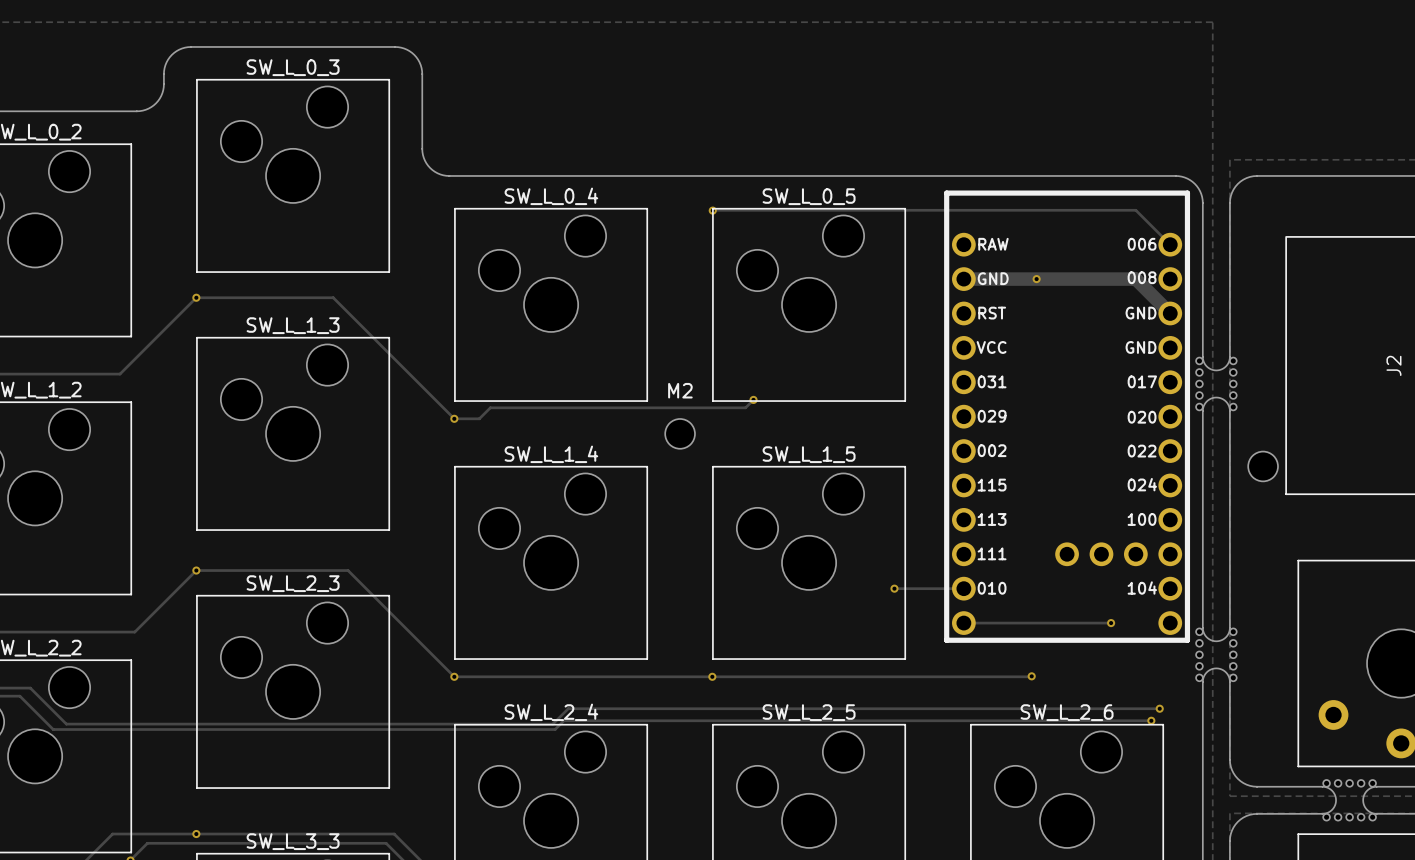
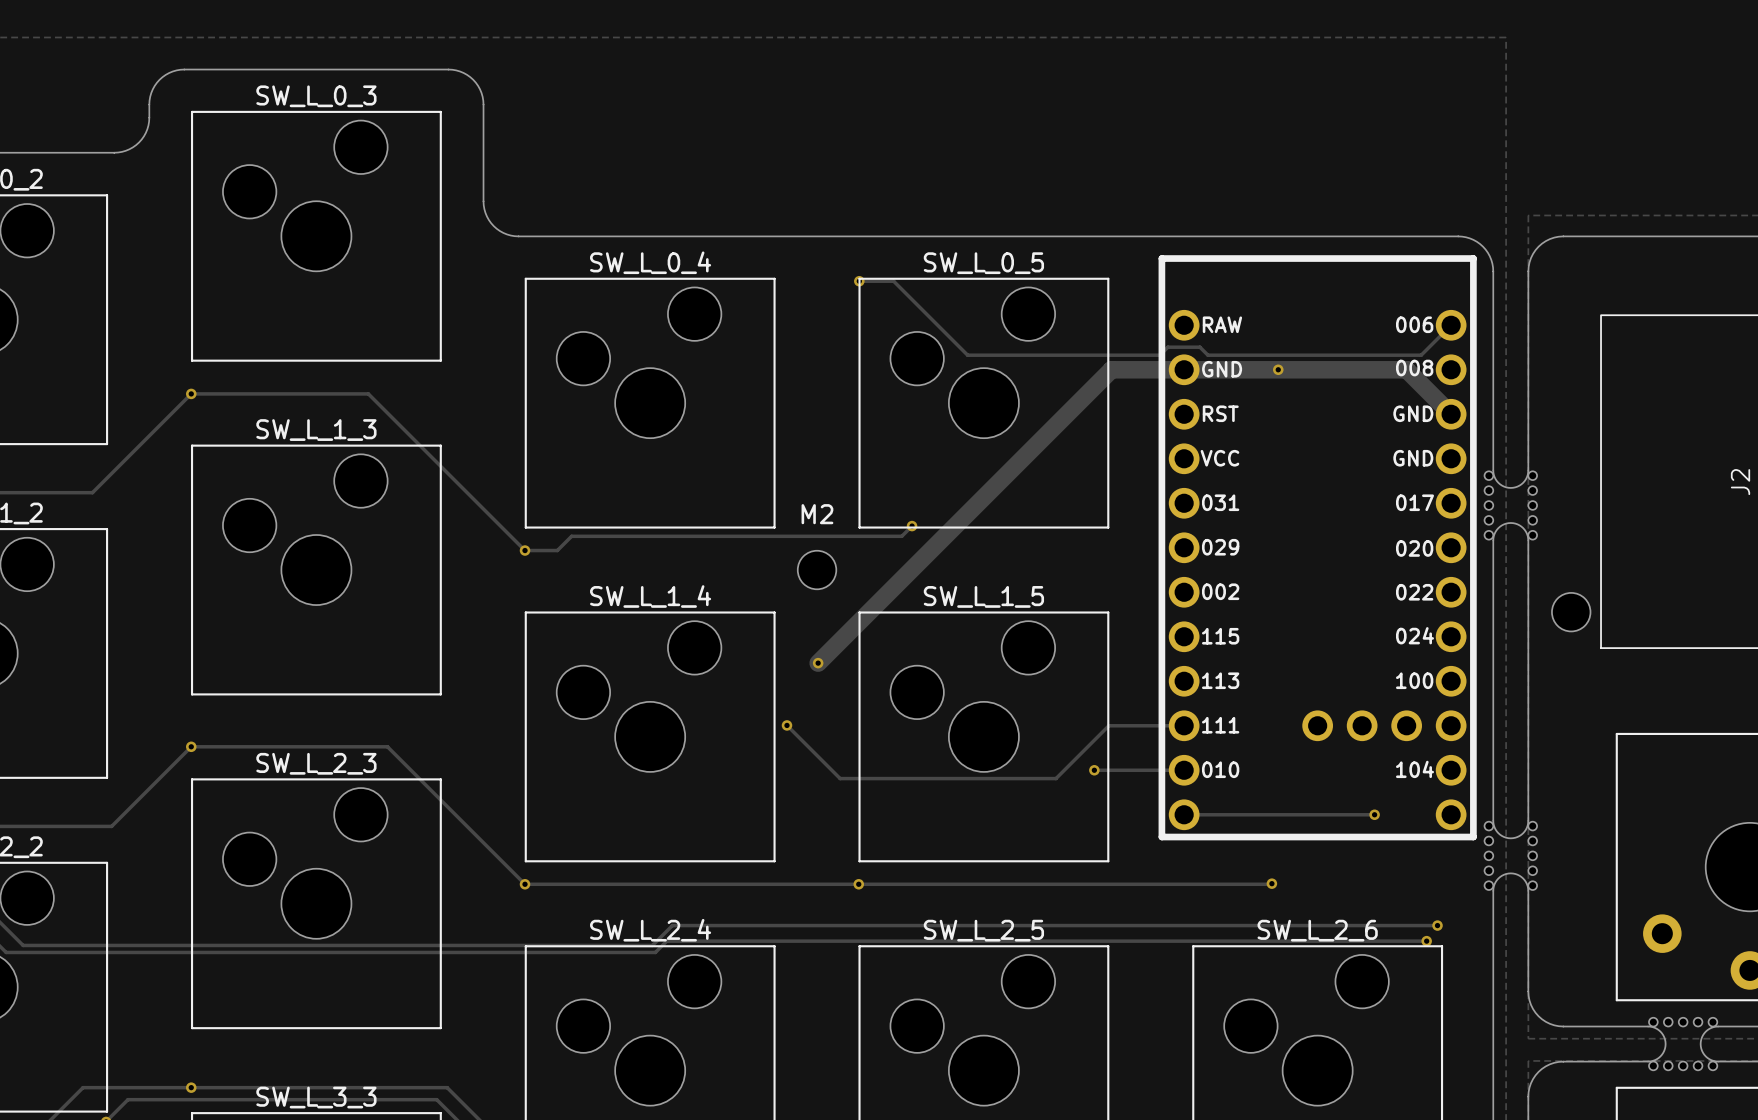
track: (713, 210) (1135, 210) (1170, 244) -> (859, 281) (893, 281) (967, 355) (1159, 355) (1167, 347) (1199, 347) (1207, 355) (1421, 355) (1451, 325)
track: none -> (1184, 369) (1111, 369) (818, 663)
via: none -> (818, 663)
track: none -> (787, 725) (840, 778) (1056, 778) (1108, 725) (1184, 725)
via: none -> (787, 725)

